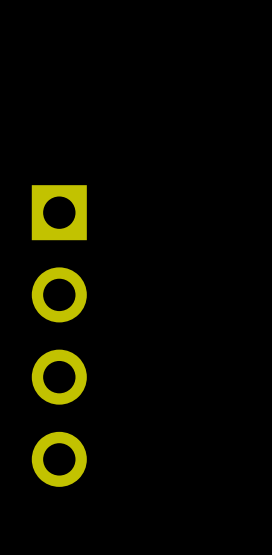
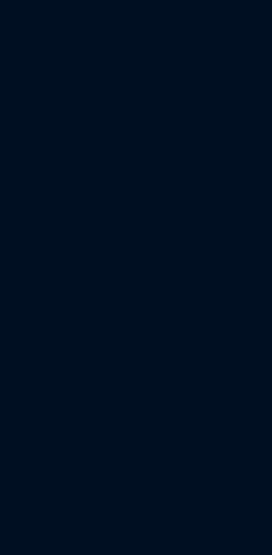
part: (59, 336) -> none

